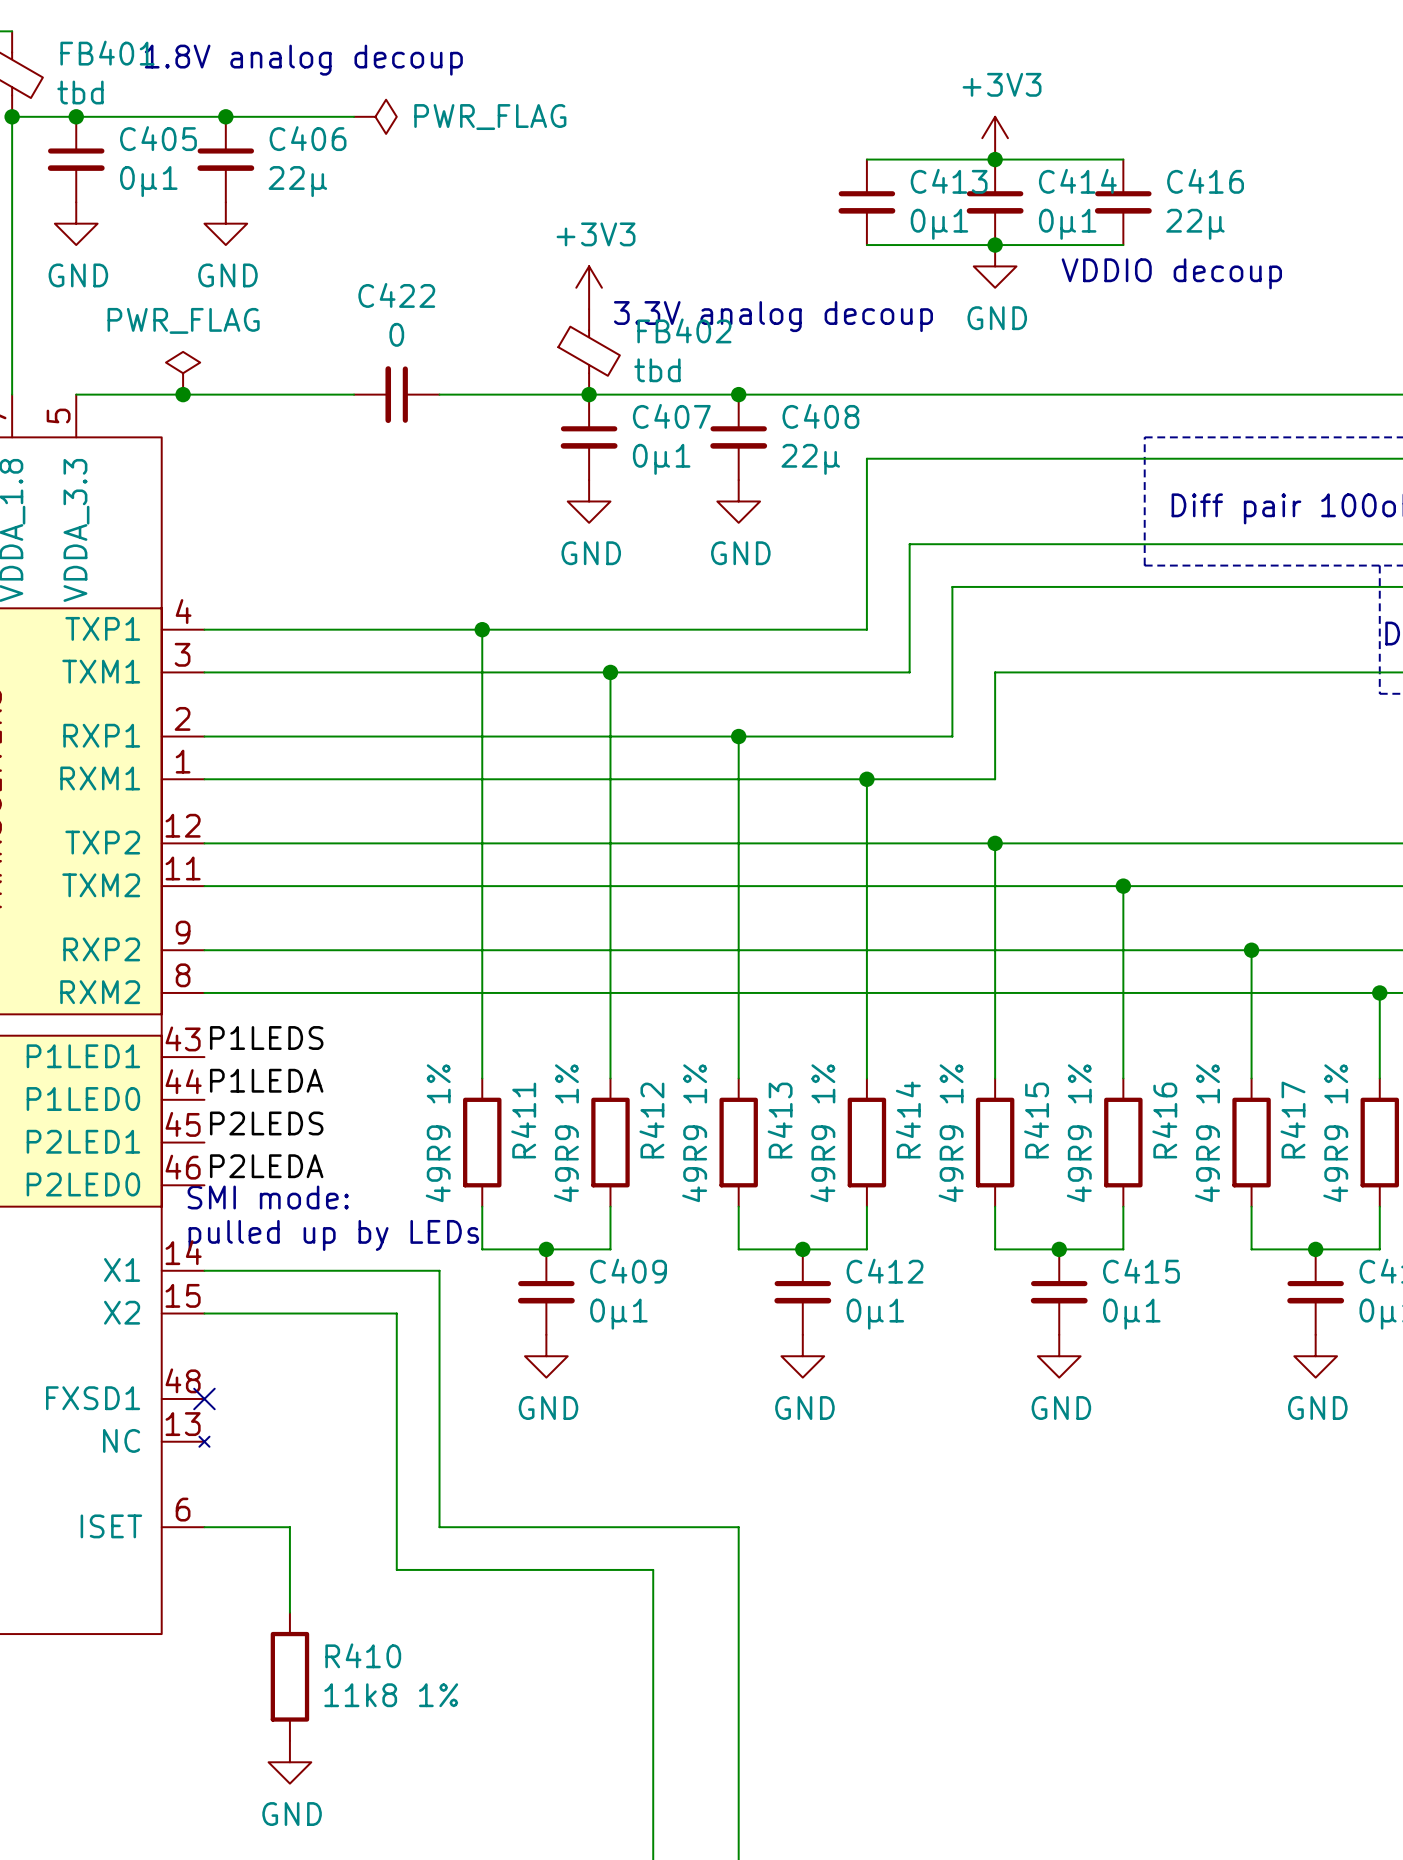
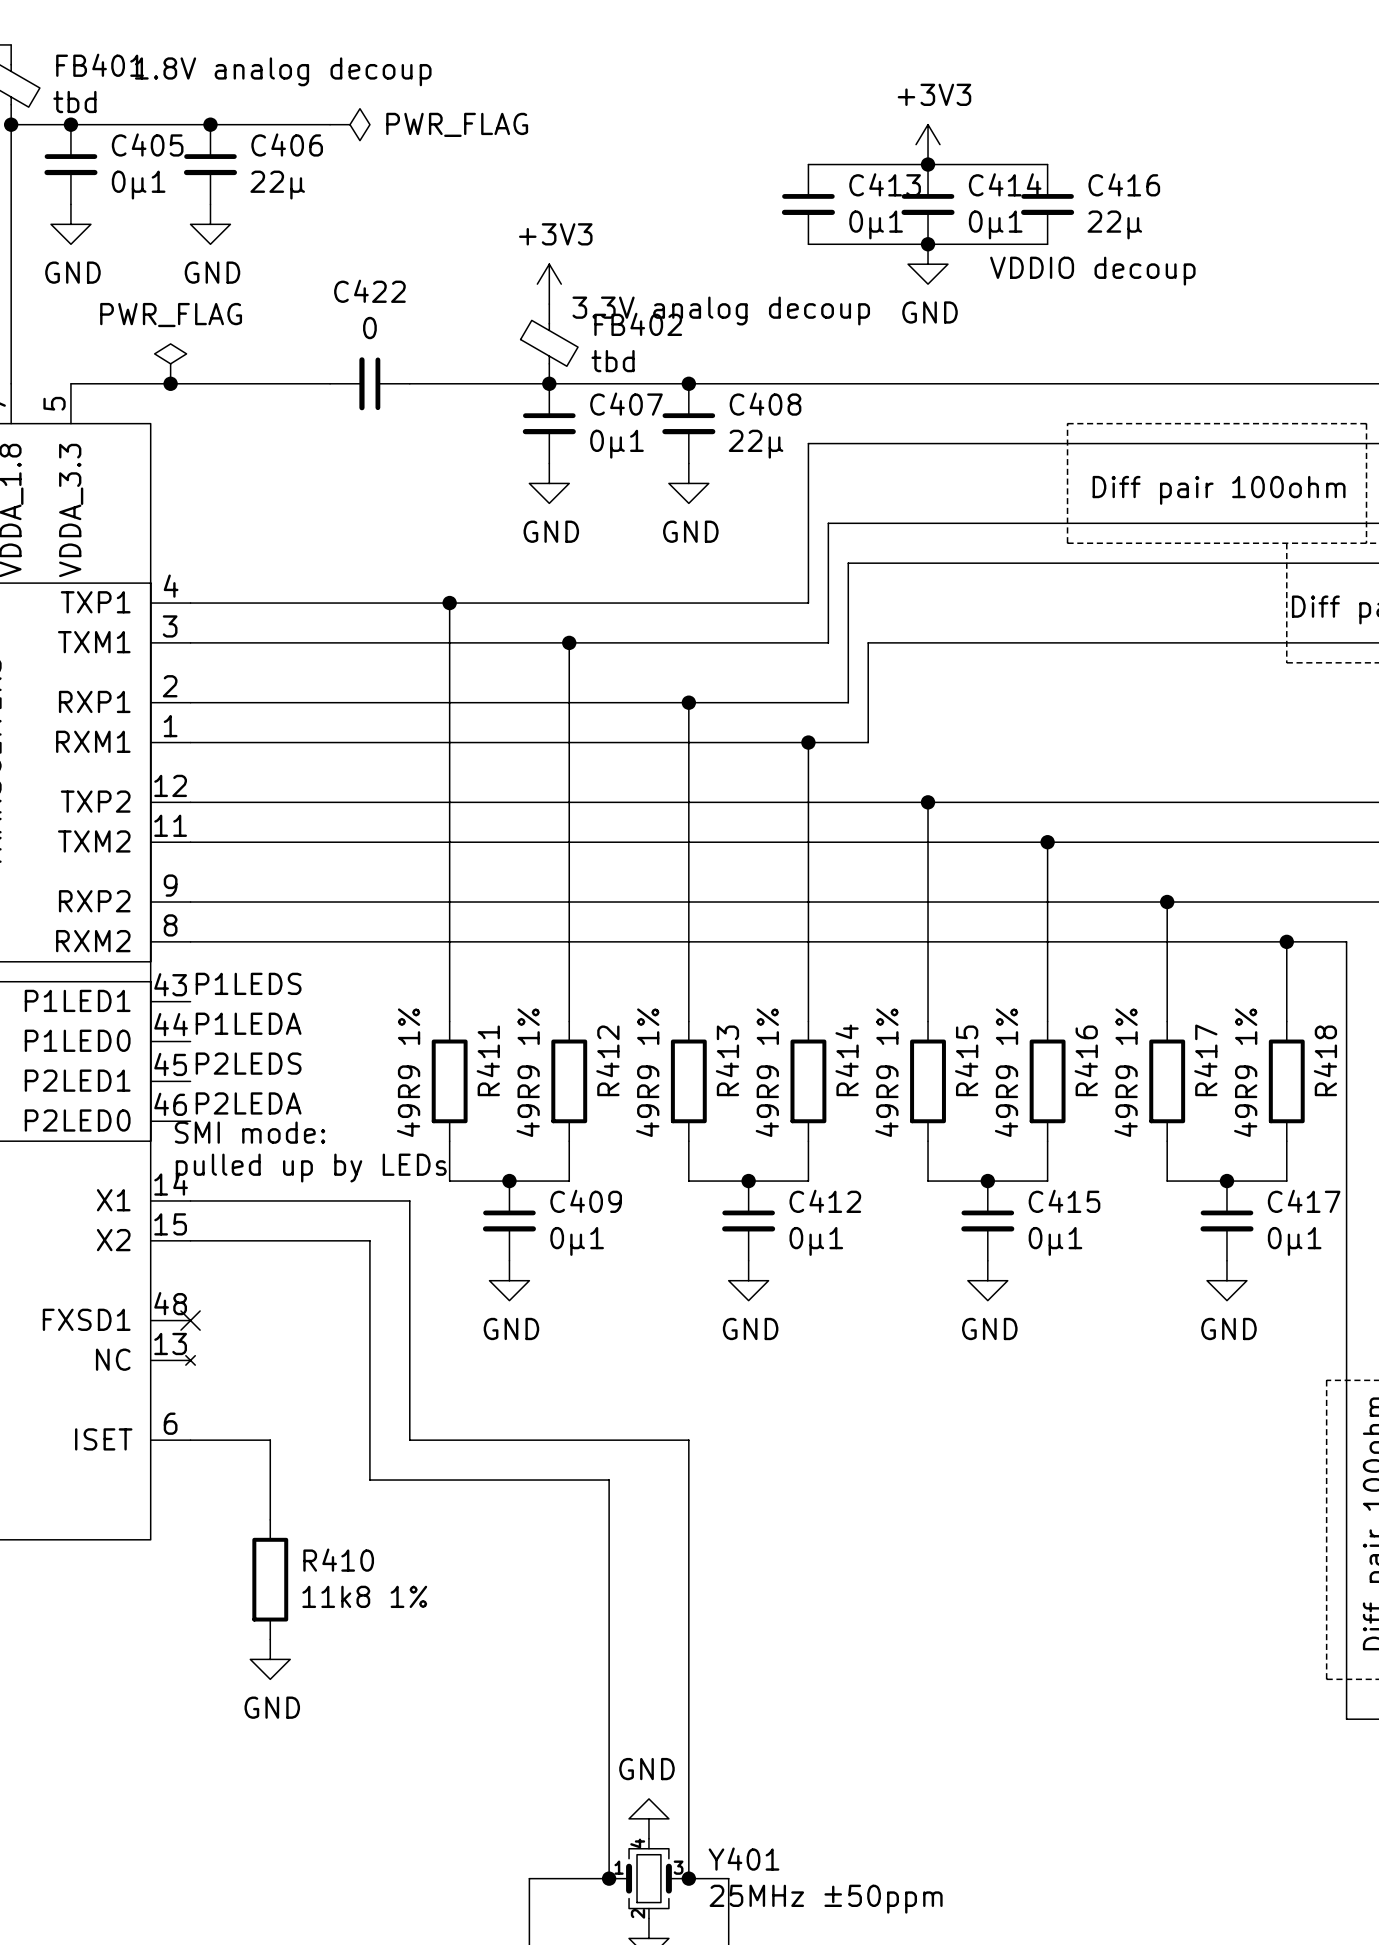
wire: (909, 544) (909, 586) -> (888, 563) (848, 563)
wire: none -> (848, 523) (828, 523) (828, 642)
wire: (952, 586) (952, 736) (909, 736) -> none
wire: (888, 672) (909, 672) -> (848, 702) (848, 642)
wire: (995, 672) (995, 779) (931, 779) -> (928, 642) (868, 642) (868, 742)

